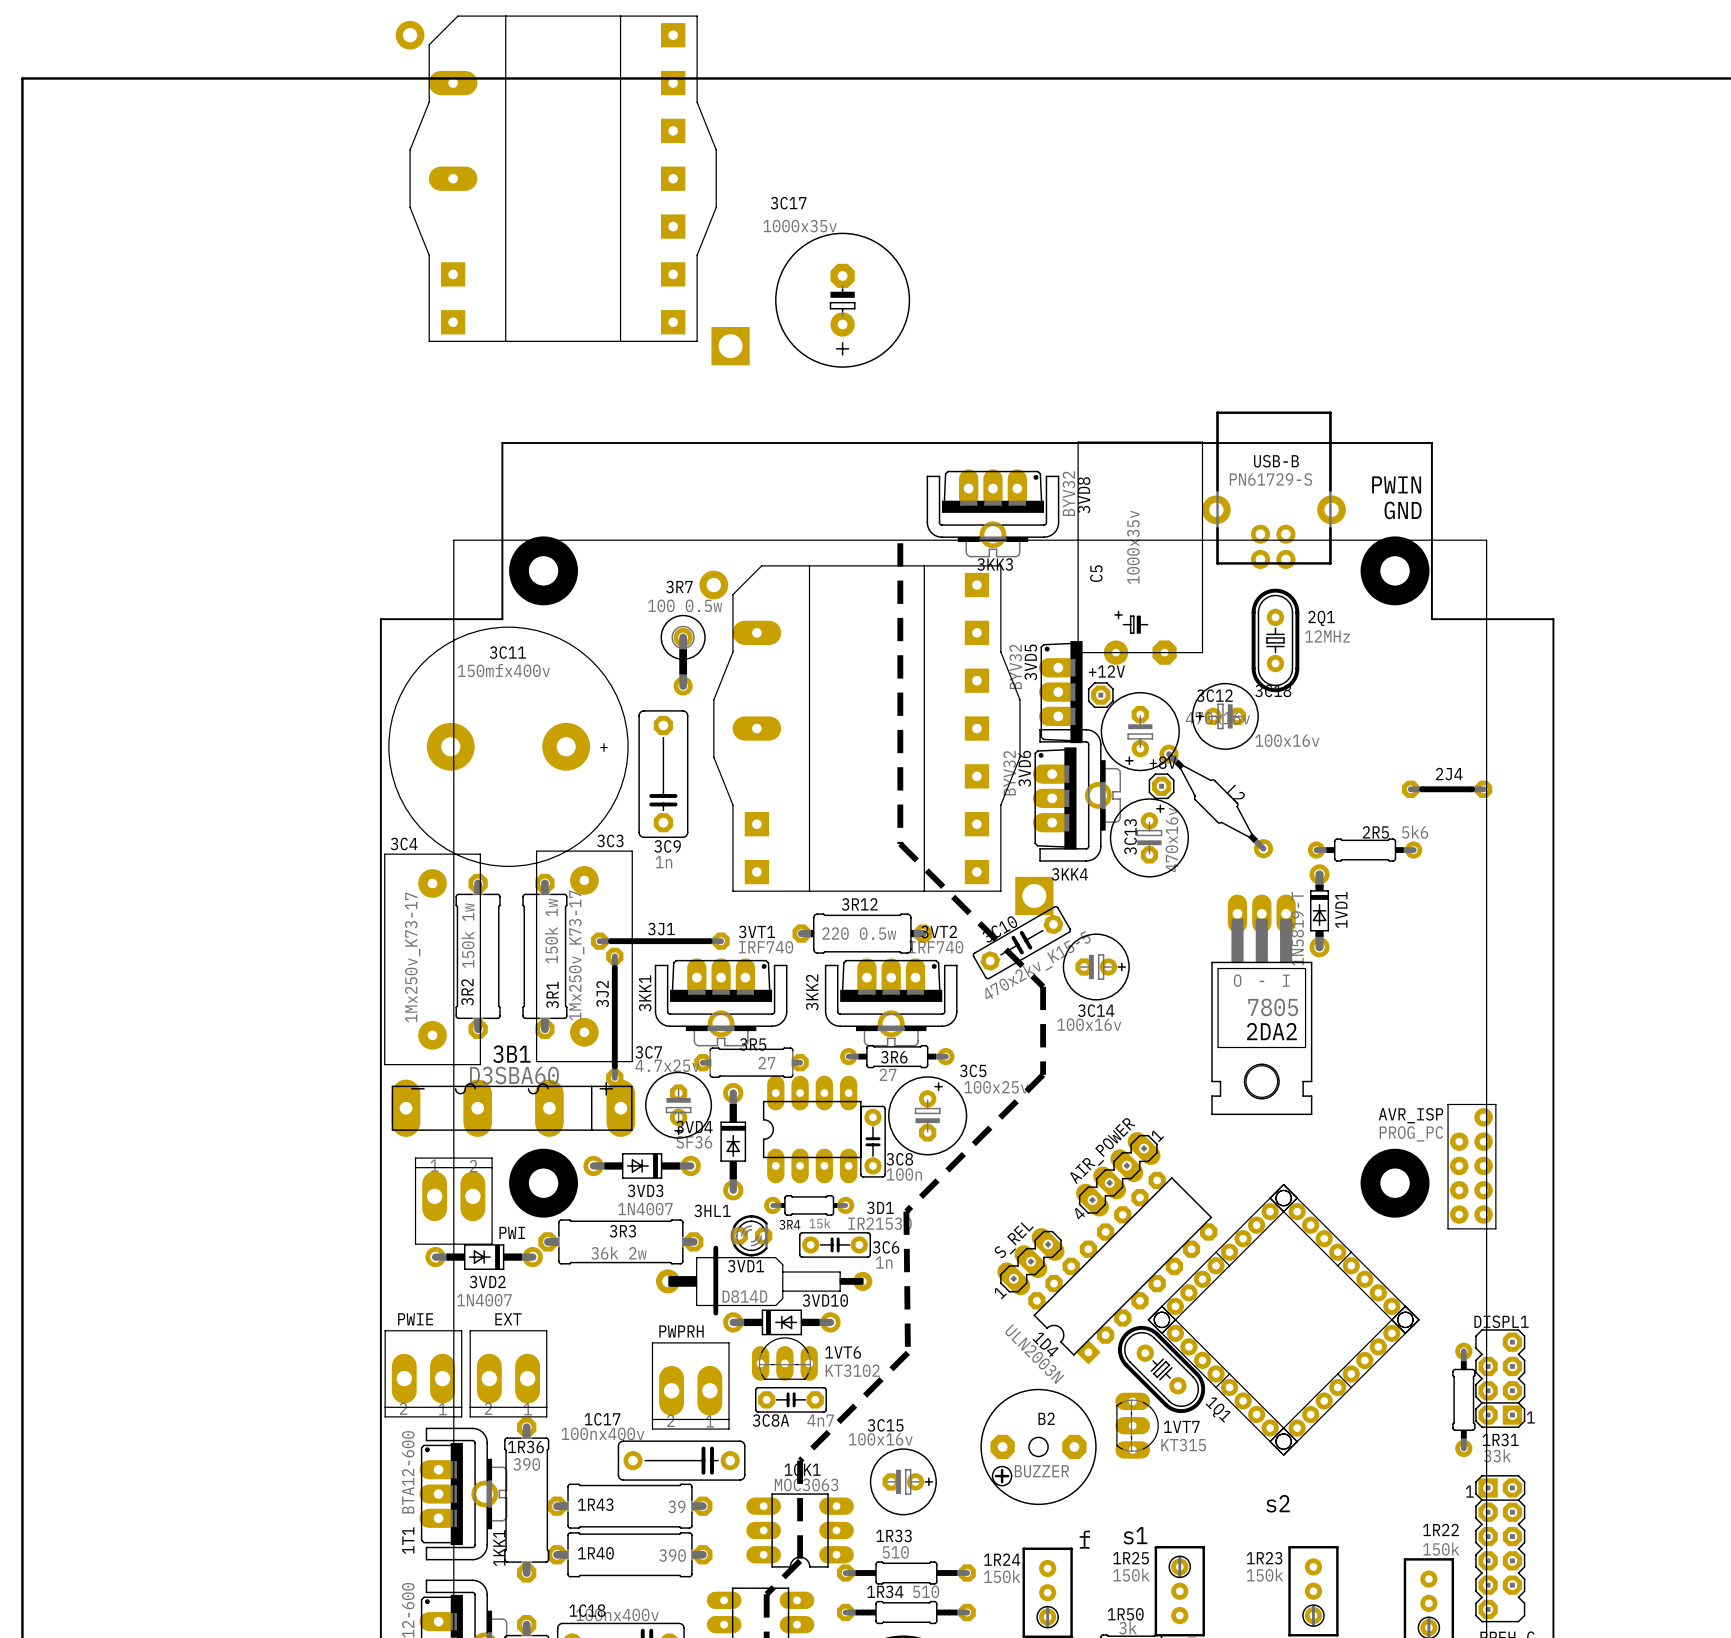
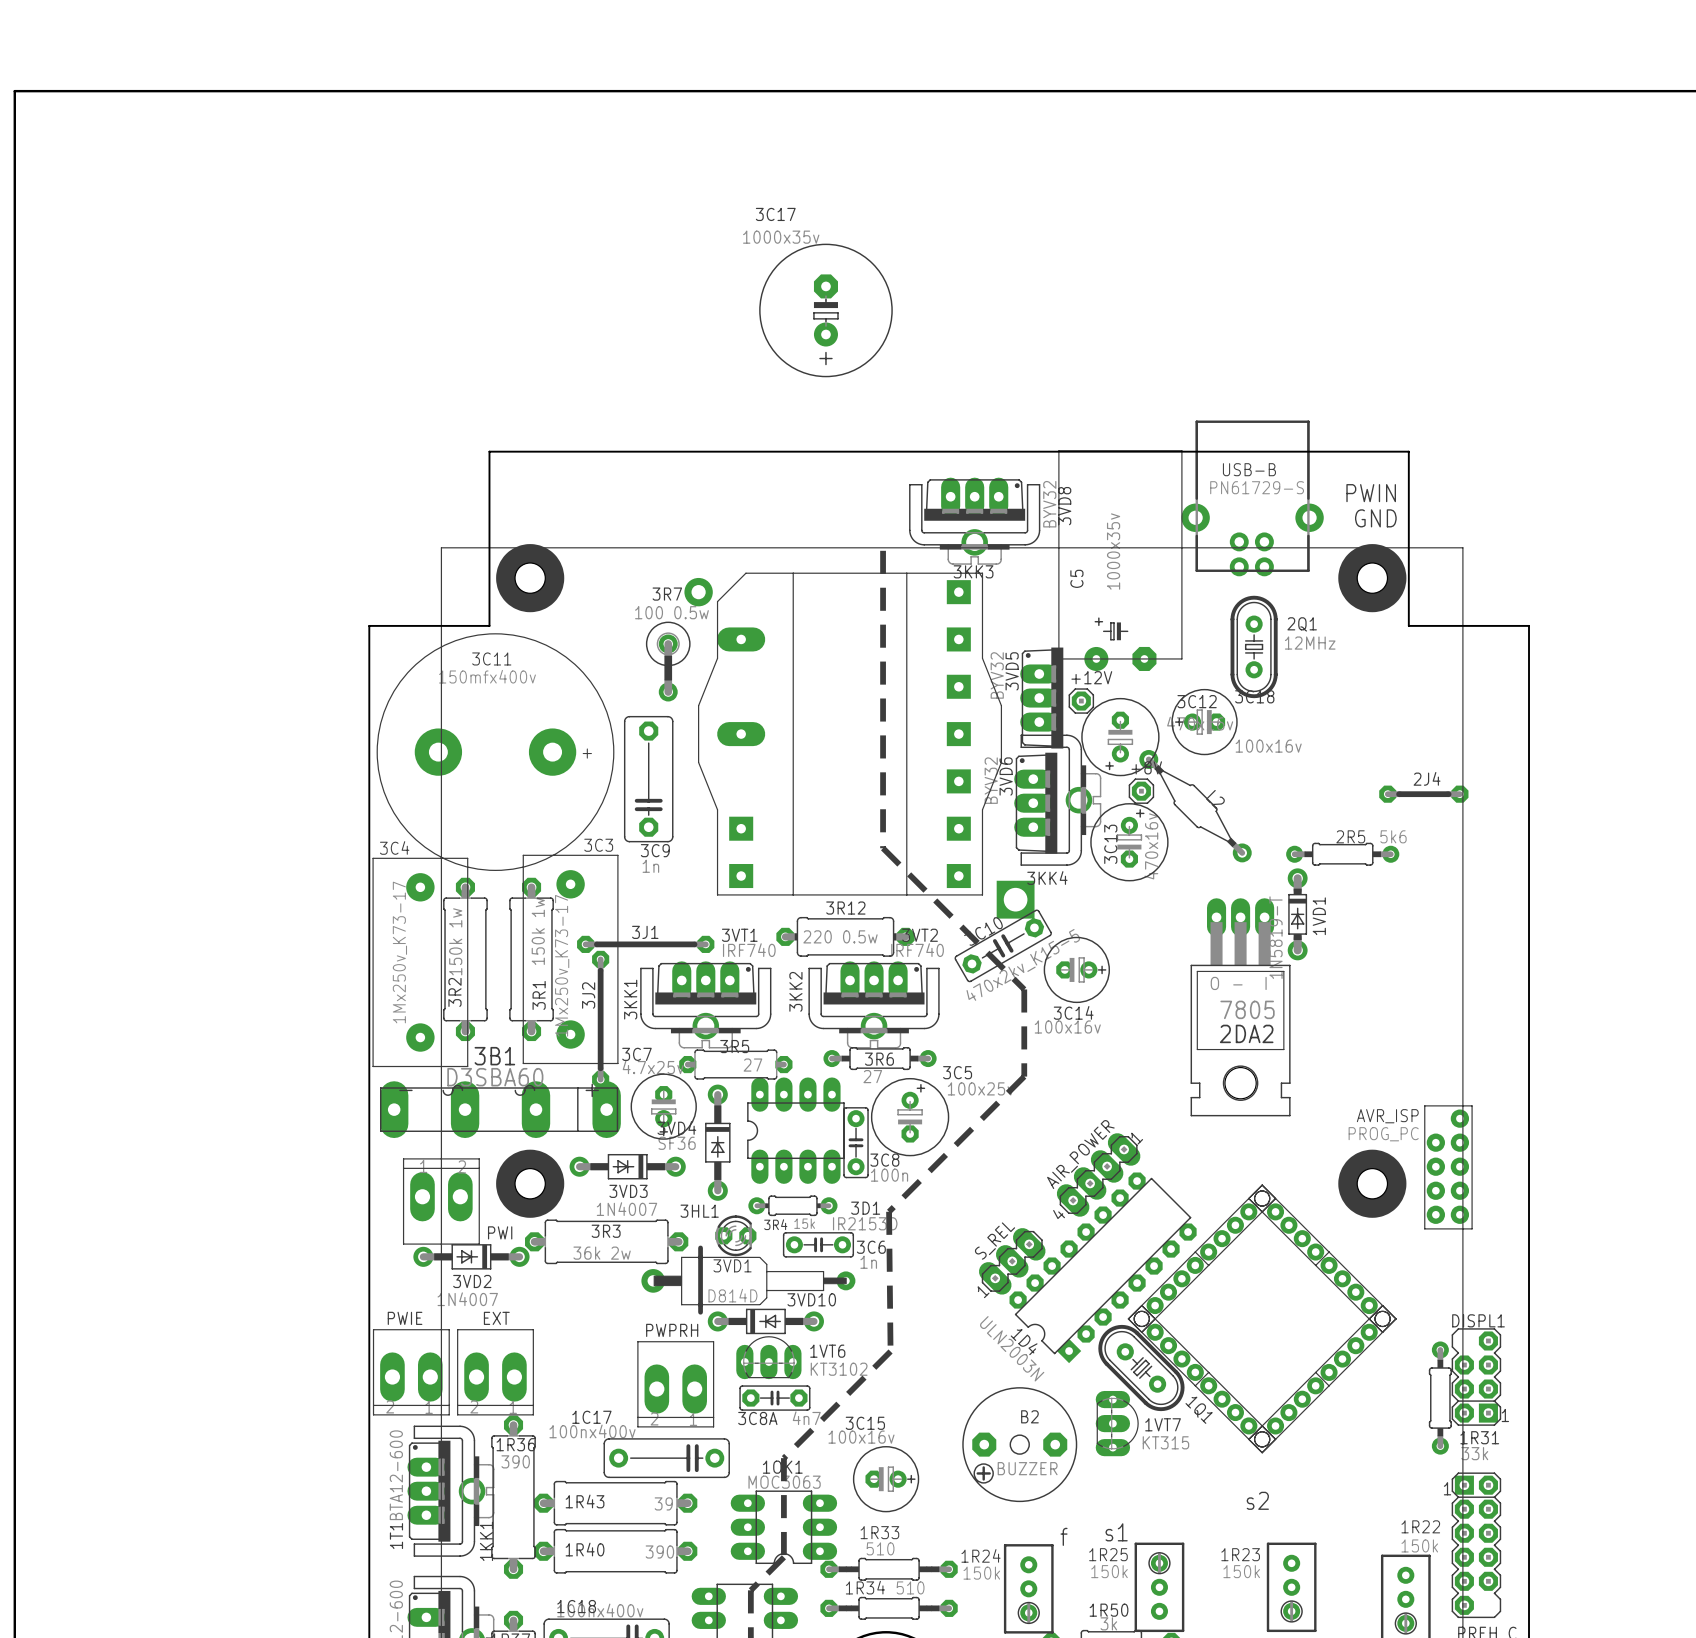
part: (572, 190) -> none

